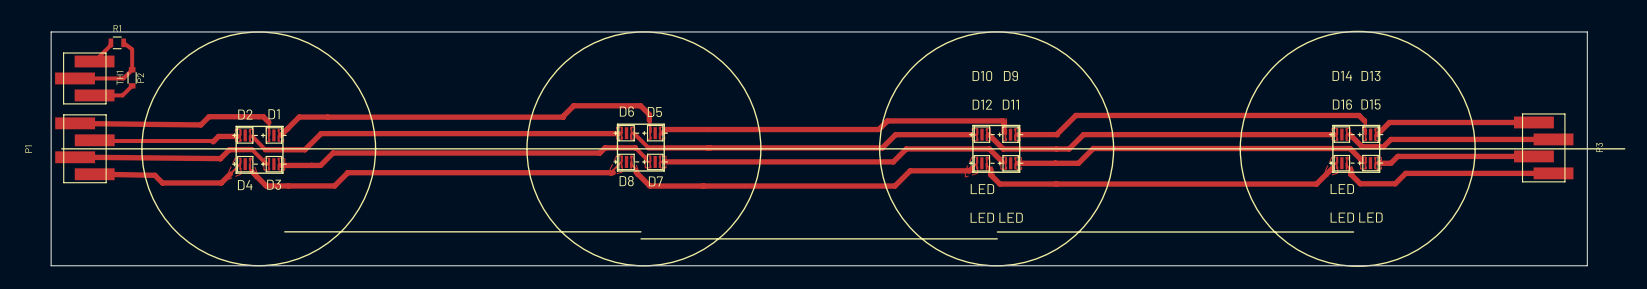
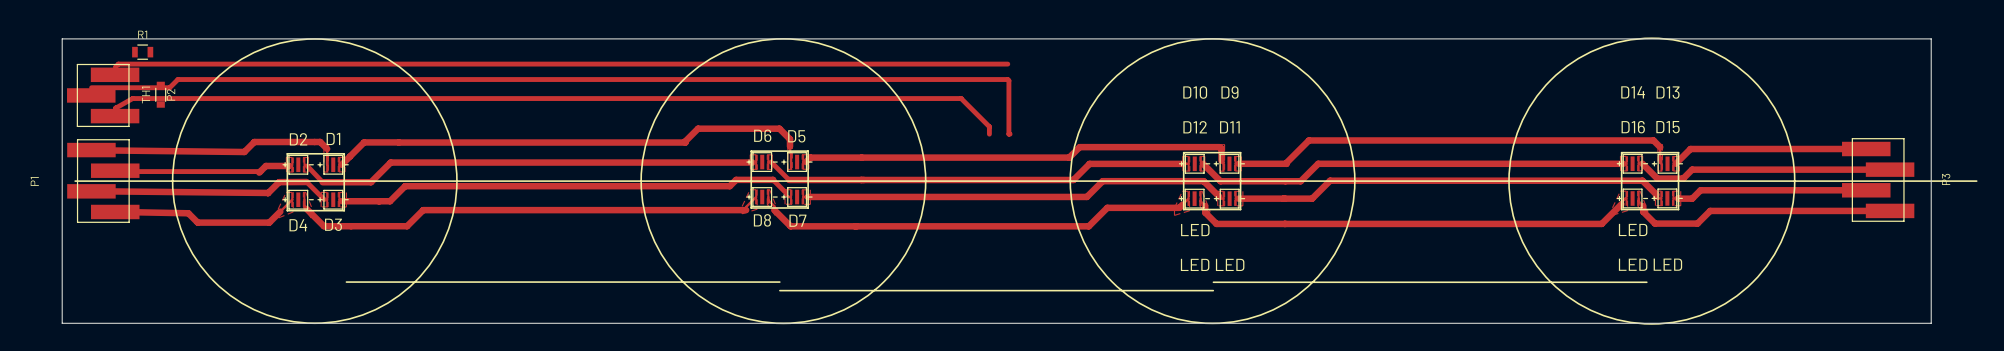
track: (110, 42) (94, 61) -> none
track: (123, 42) (132, 49) (132, 69) (123, 78) (75, 78) -> none
track: none -> (1007, 64) (118, 64) (115, 67)
track: none -> (91, 87) (169, 87) (177, 79) (1007, 79) (1010, 134)
track: (132, 85) (122, 95) (95, 94) -> none
track: none -> (116, 107) (132, 98) (961, 98) (989, 126) (989, 134)

